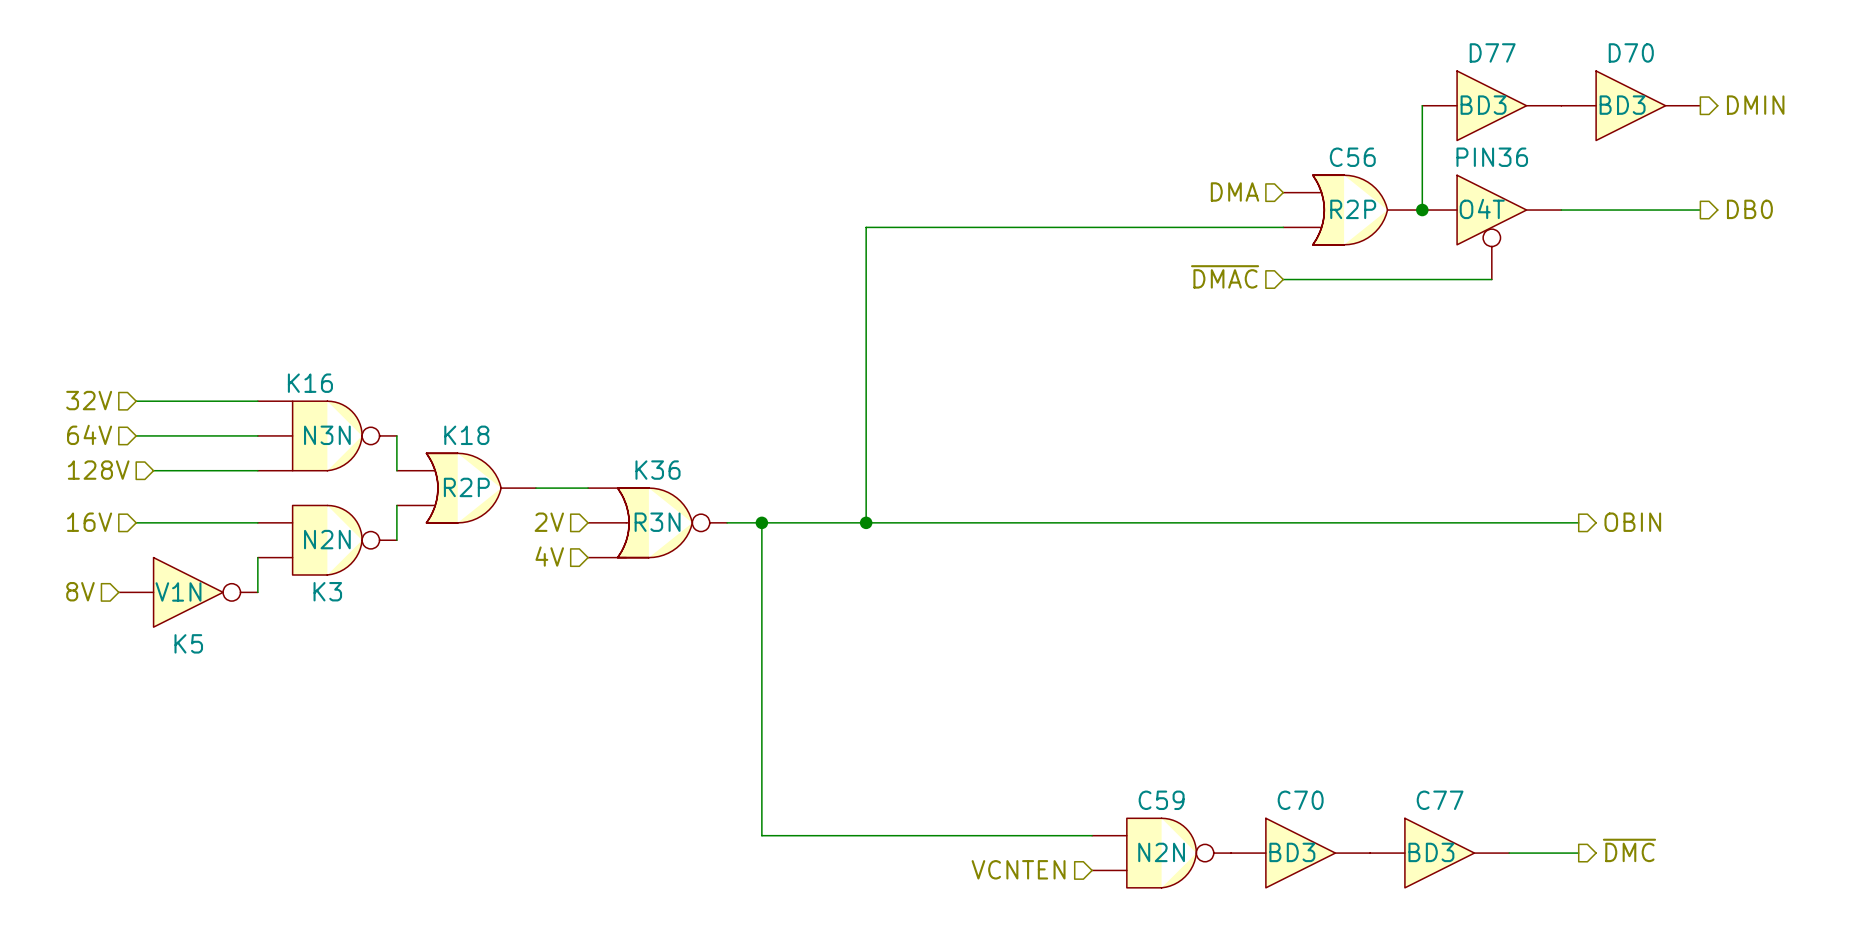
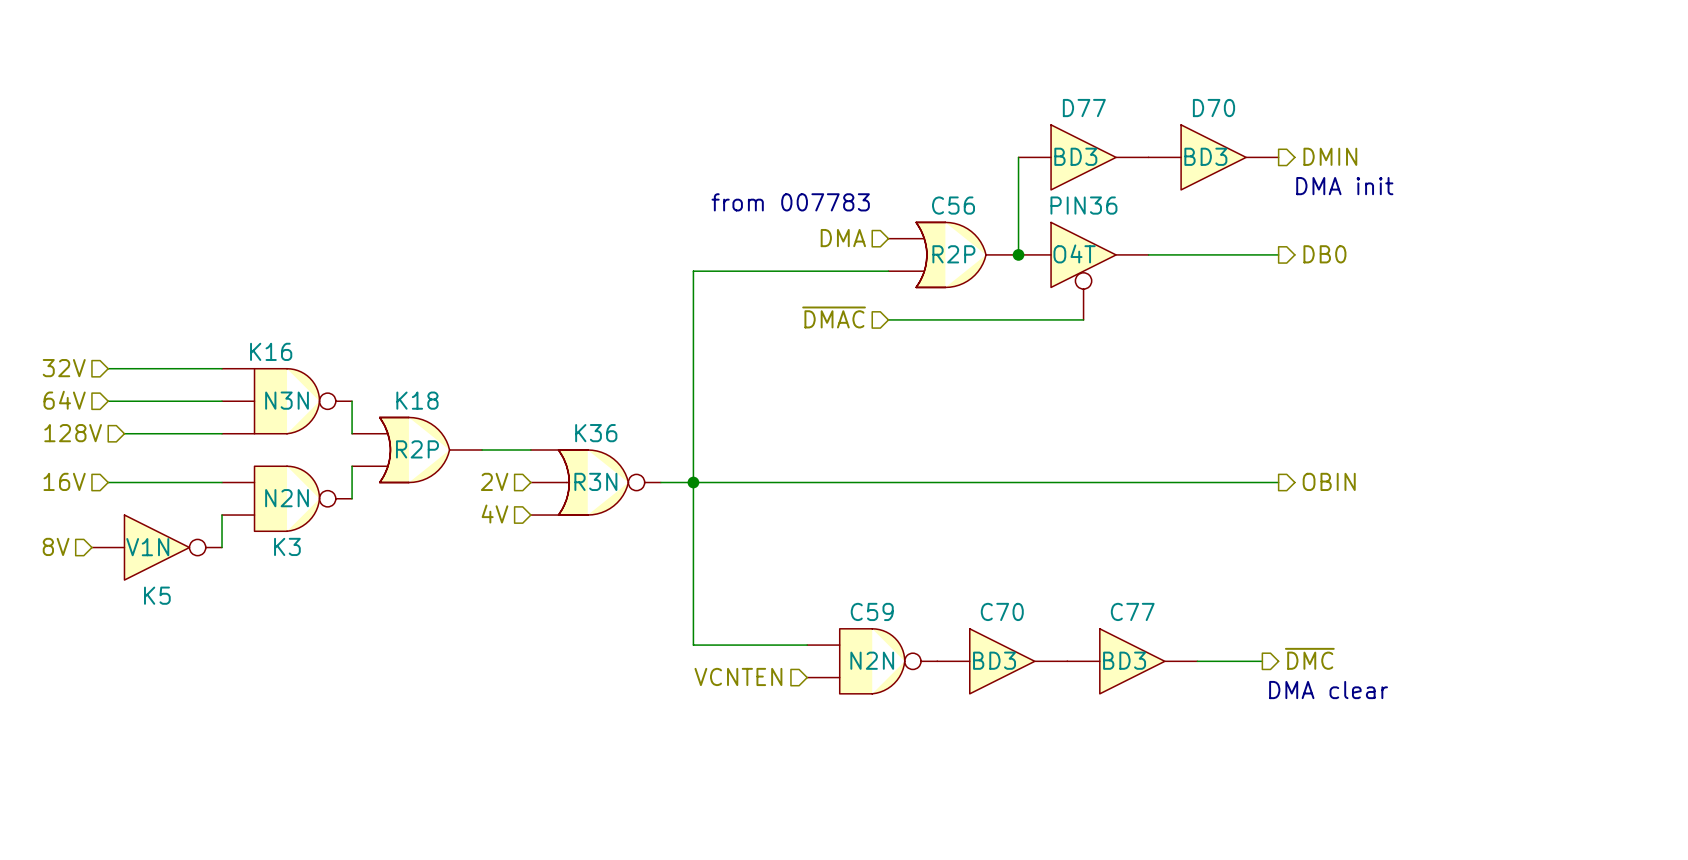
wire: (1422, 105) (1422, 210) -> (1018, 157) (1018, 254)
D77 position: (1491, 105) -> (1083, 157)
D70 position: (1630, 105) -> (1213, 157)
hierarchical label position: DMIN (1755, 105) -> DMIN (1330, 156)
hierarchical label position: DMA (1234, 191) -> DMA (843, 238)
text: none -> DMA init (1344, 186)
hierarchical label position: DB0 (1749, 209) -> DB0 (1324, 254)
C56 position: (1352, 210) -> (953, 254)
junction: (1422, 210) -> none
wire: (1561, 210) (1700, 210) -> none
text: none -> from 007783 (790, 202)
wire: (1283, 227) (866, 227) (866, 522) -> none
PIN36 position: (1491, 227) -> (1083, 271)
hierarchical label position: ~{DMAC} (1225, 276) -> ~{DMAC} (834, 317)
junction: none -> (1018, 254)
wire: none -> (1148, 254) (1181, 254)
wire: (1387, 279) (1491, 279) -> none
wire: none -> (888, 271) (693, 271) (693, 482)
wire: none -> (888, 319) (1083, 319)
junction: (866, 522) -> none
wire: (1387, 522) (1578, 522) -> none
hierarchical label position: OBIN (1632, 522) -> OBIN (1329, 481)
wire: (761, 696) (761, 835) (1092, 835) -> (693, 645) (807, 645)
text: none -> DMA clear (1328, 690)
hierarchical label position: ~{DMC} (1629, 850) -> ~{DMC} (1309, 658)
C59 position: (1161, 853) -> (872, 661)
C70 position: (1300, 853) -> (1002, 661)
C77 position: (1439, 853) -> (1132, 661)
wire: (1509, 853) (1578, 853) -> (1197, 661) (1262, 661)
hierarchical label position: VCNTEN (1018, 869) -> VCNTEN (738, 676)

